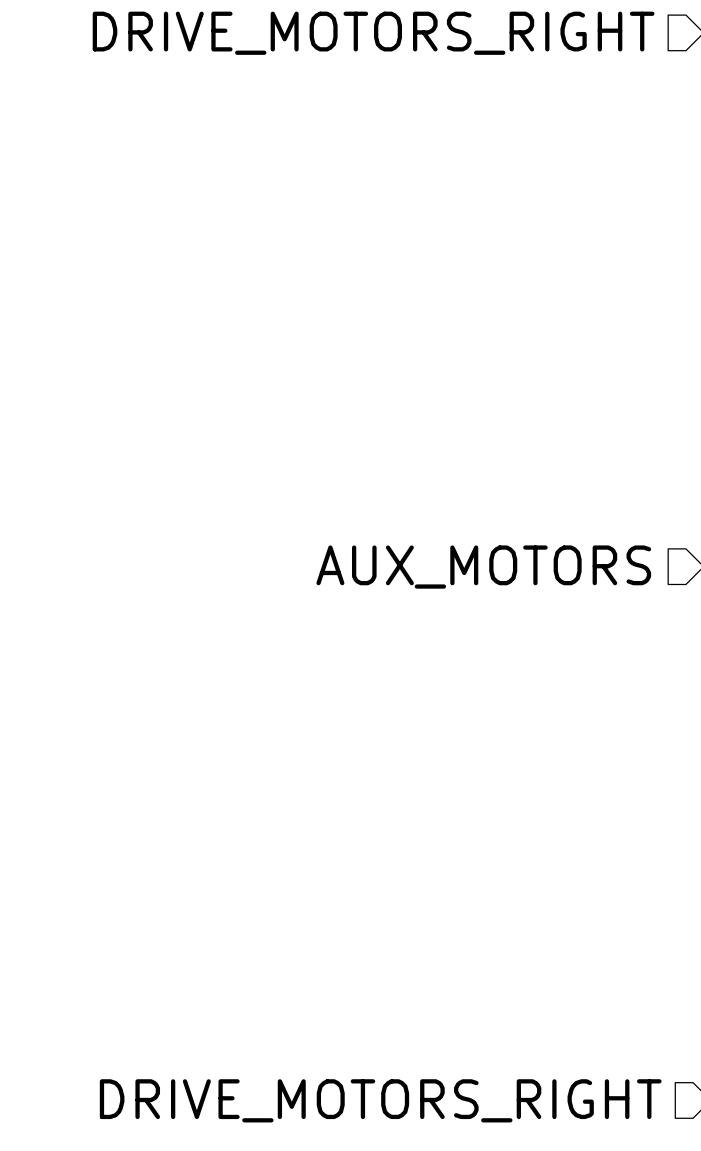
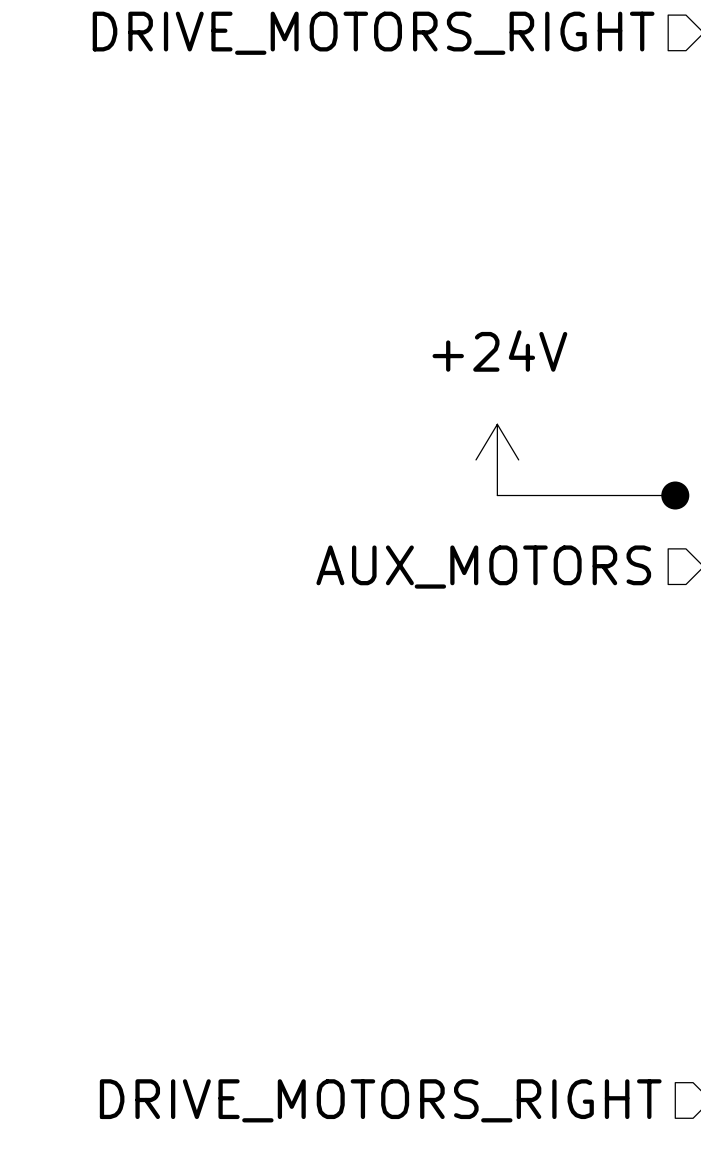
power symbol: none -> +24V (497, 459)
wire: none -> (497, 495) (675, 495)
junction: none -> (675, 495)

